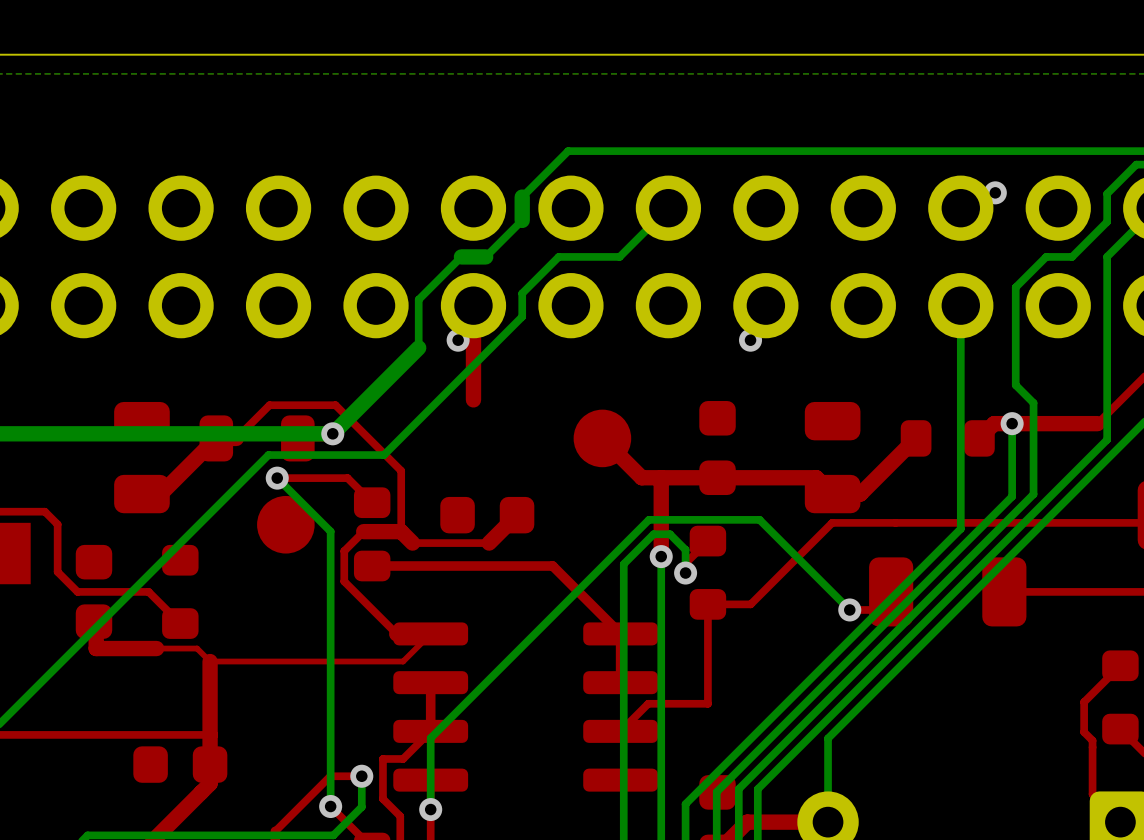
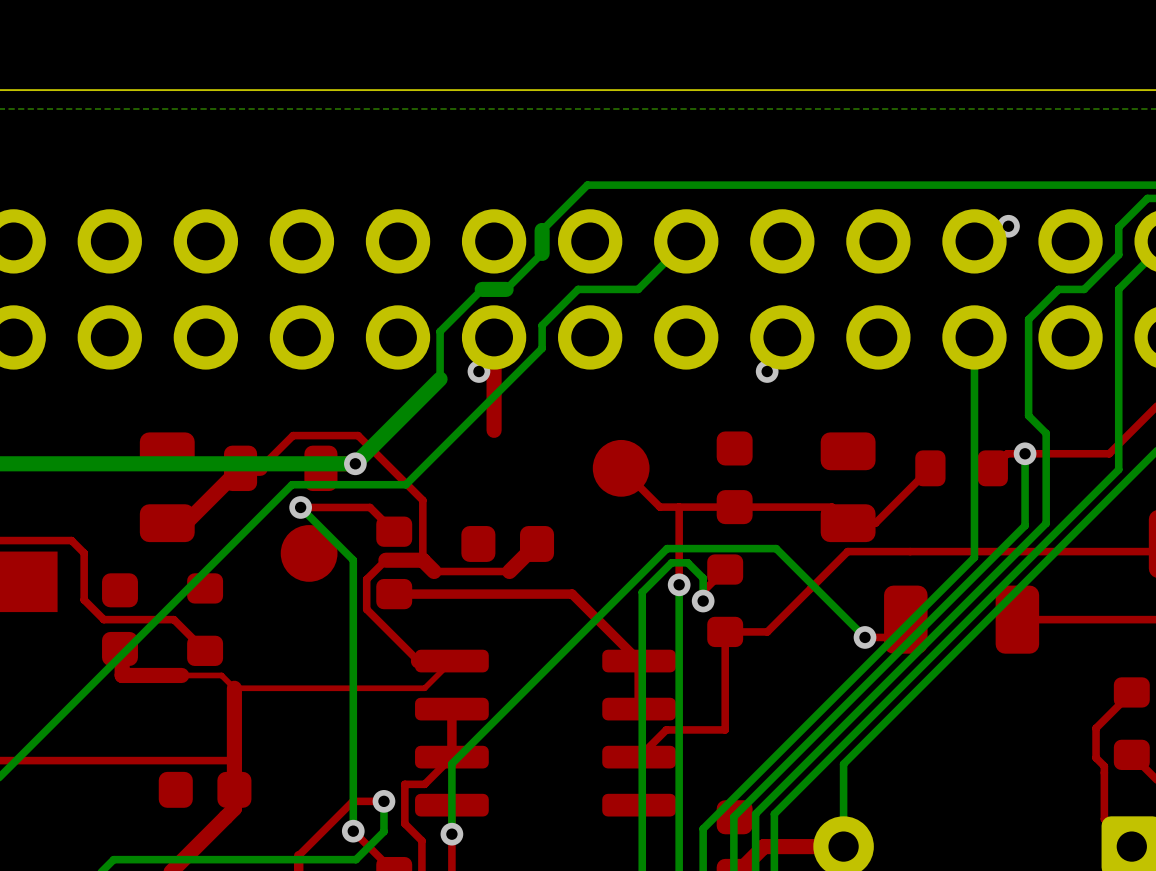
top track width: thick (1097, 423) (994, 423) (979, 438) -> thin (1109, 453) (1007, 453) (992, 468)
top track width: thick (916, 438) (860, 494) (832, 494) (816, 477) (641, 477) (602, 438) -> thin (930, 468) (875, 523) (848, 523) (832, 507) (659, 507) (621, 468)
top track width: thick (661, 477) (661, 556) -> thin (679, 507) (679, 584)

